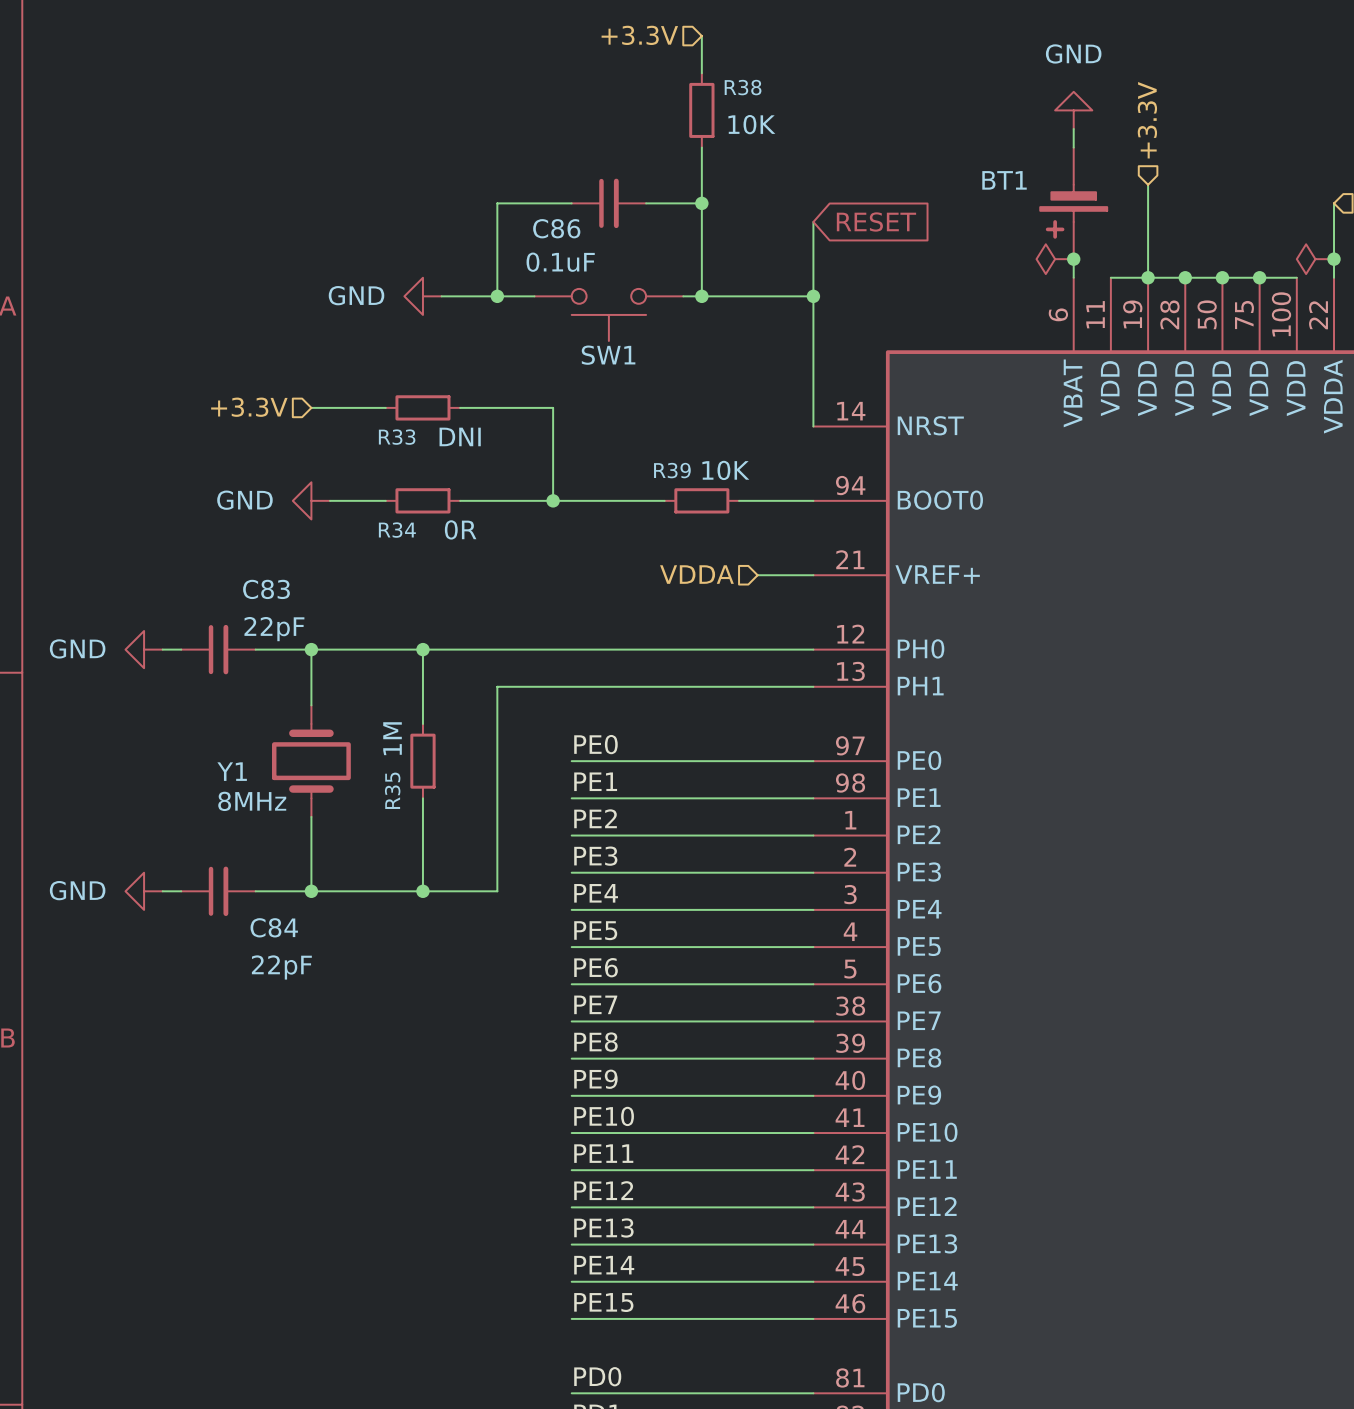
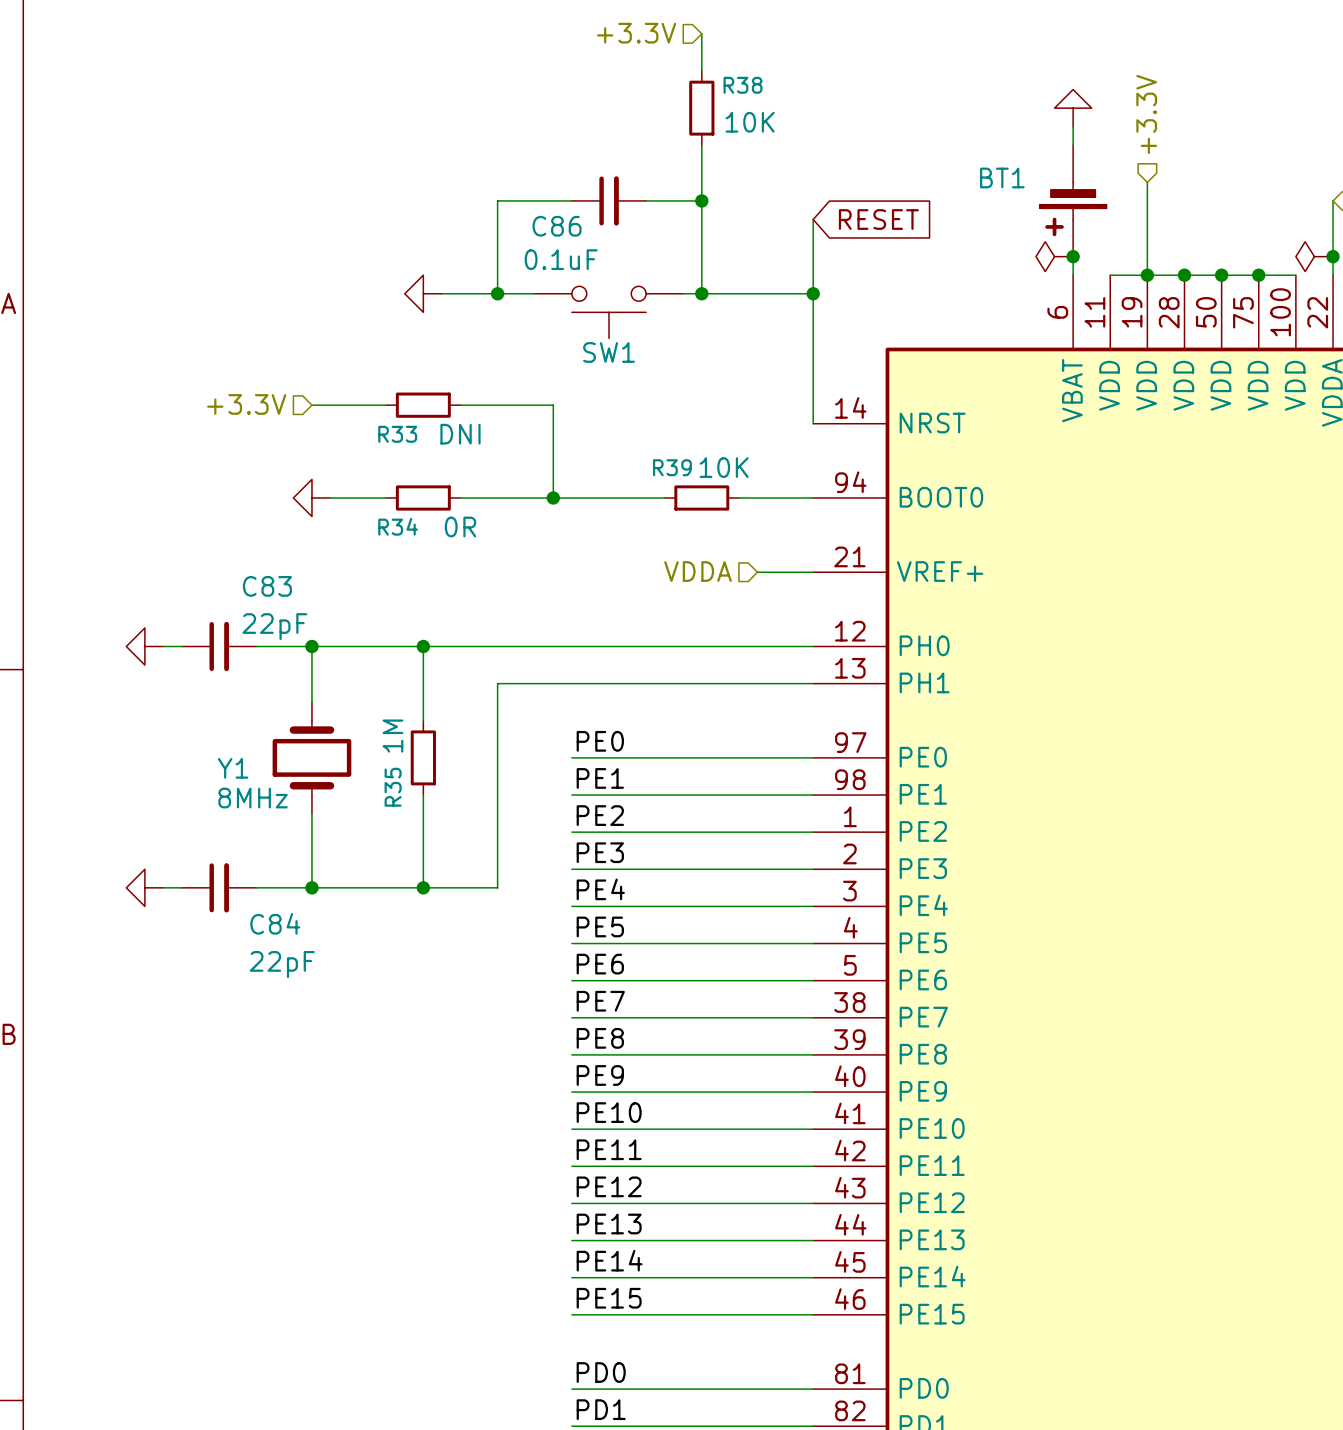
power symbol text: GND (1073, 53) -> none
power symbol text: GND (356, 295) -> none
power symbol text: GND (244, 500) -> none
power symbol text: GND (77, 648) -> none
power symbol text: GND (77, 890) -> none

